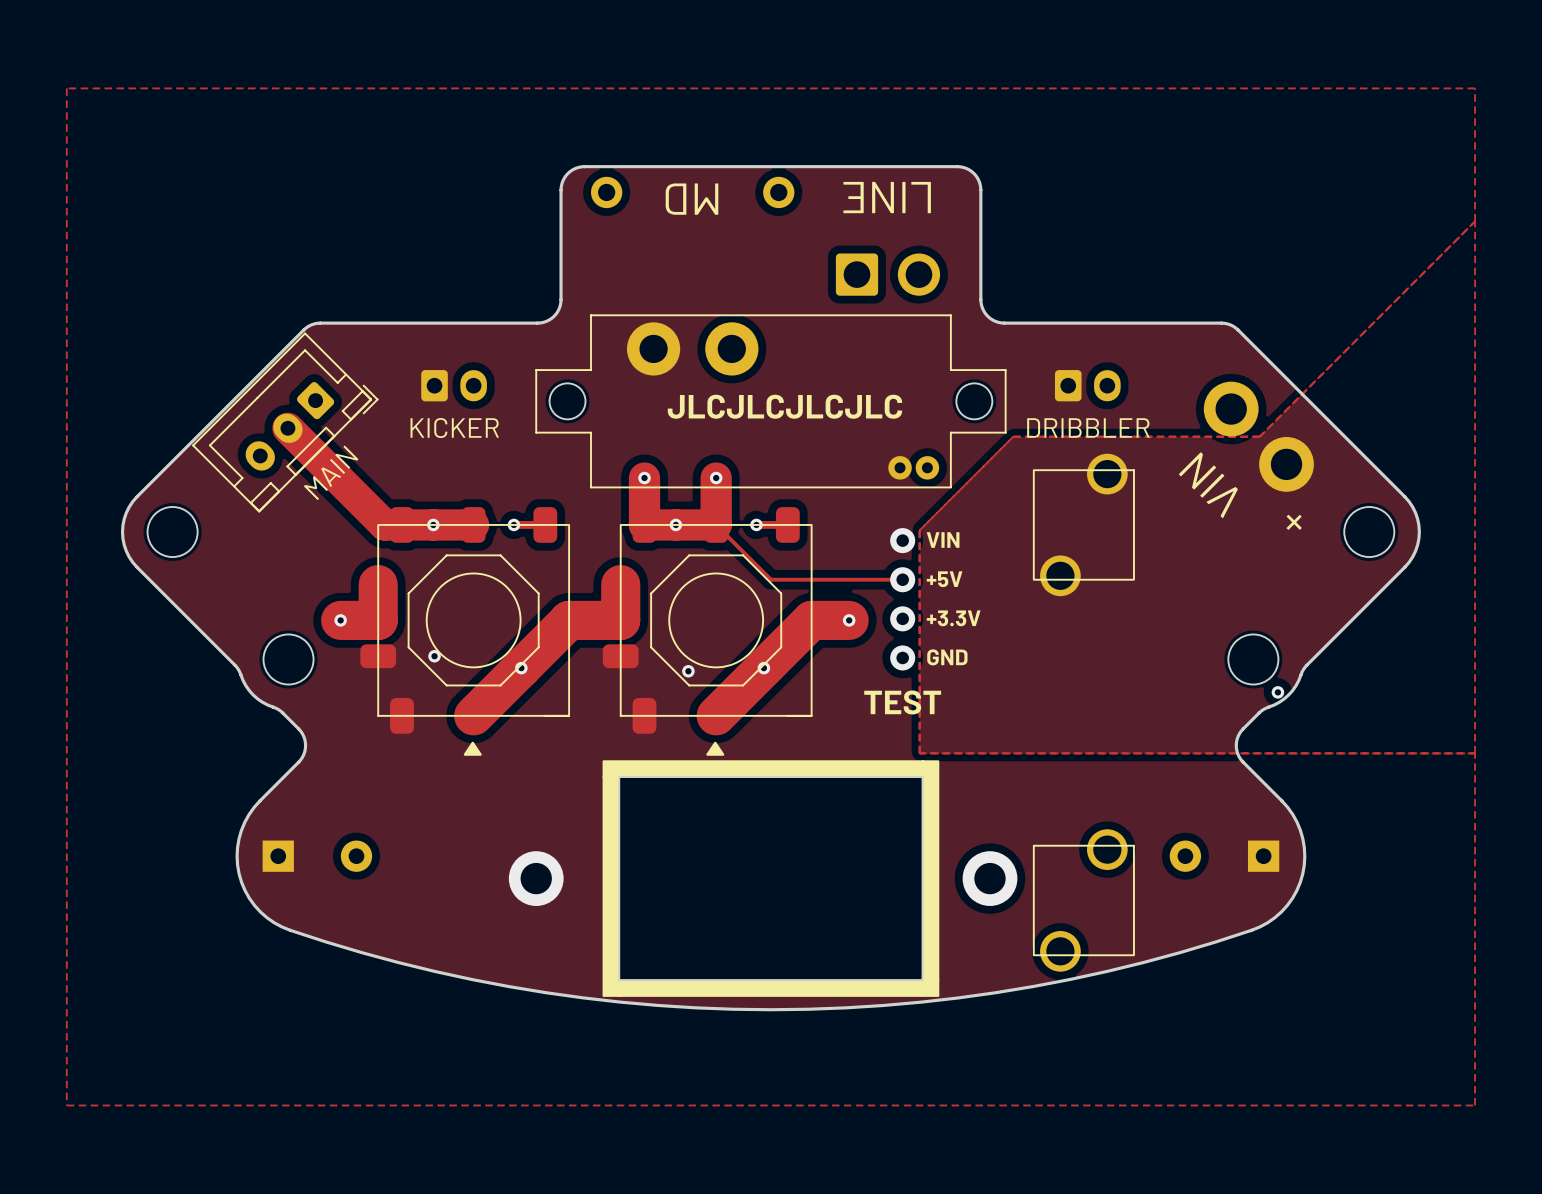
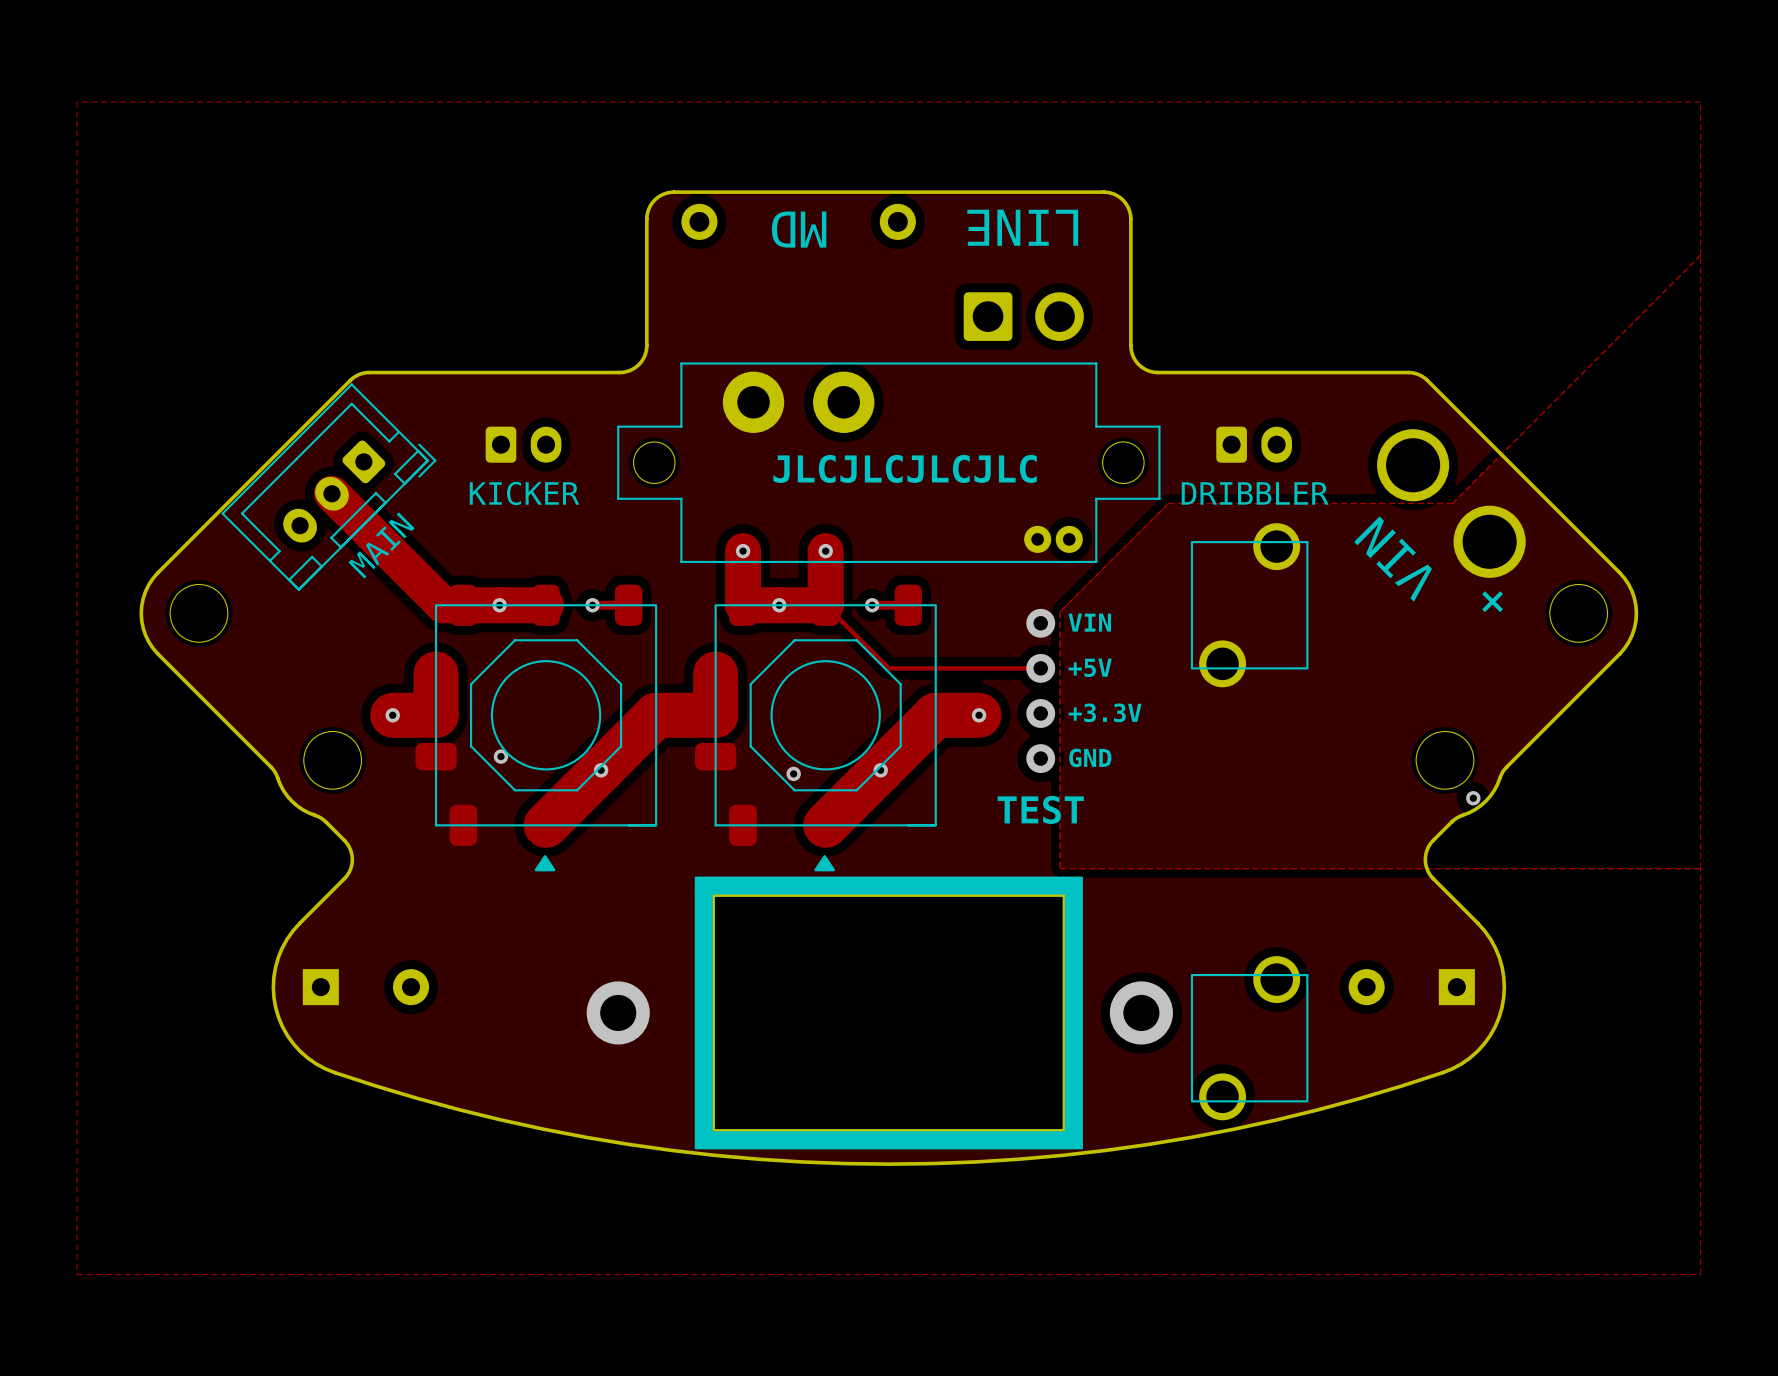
VIN footprint: [1203, 381, 1314, 492] -> [1377, 429, 1526, 578]

